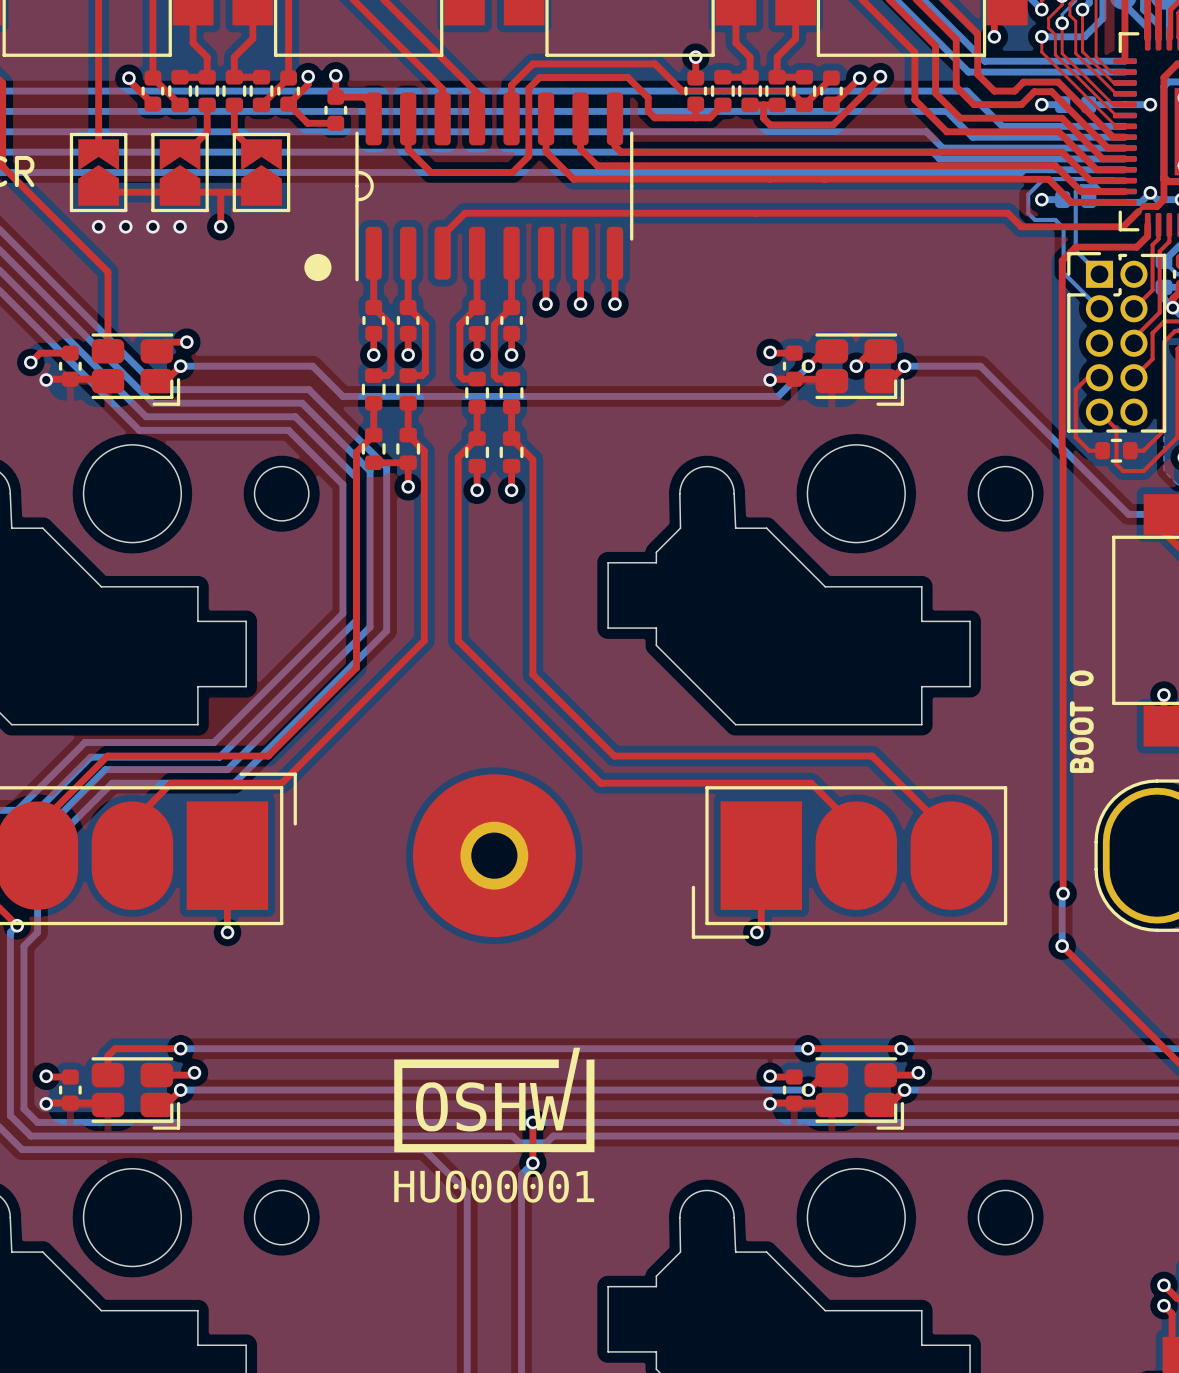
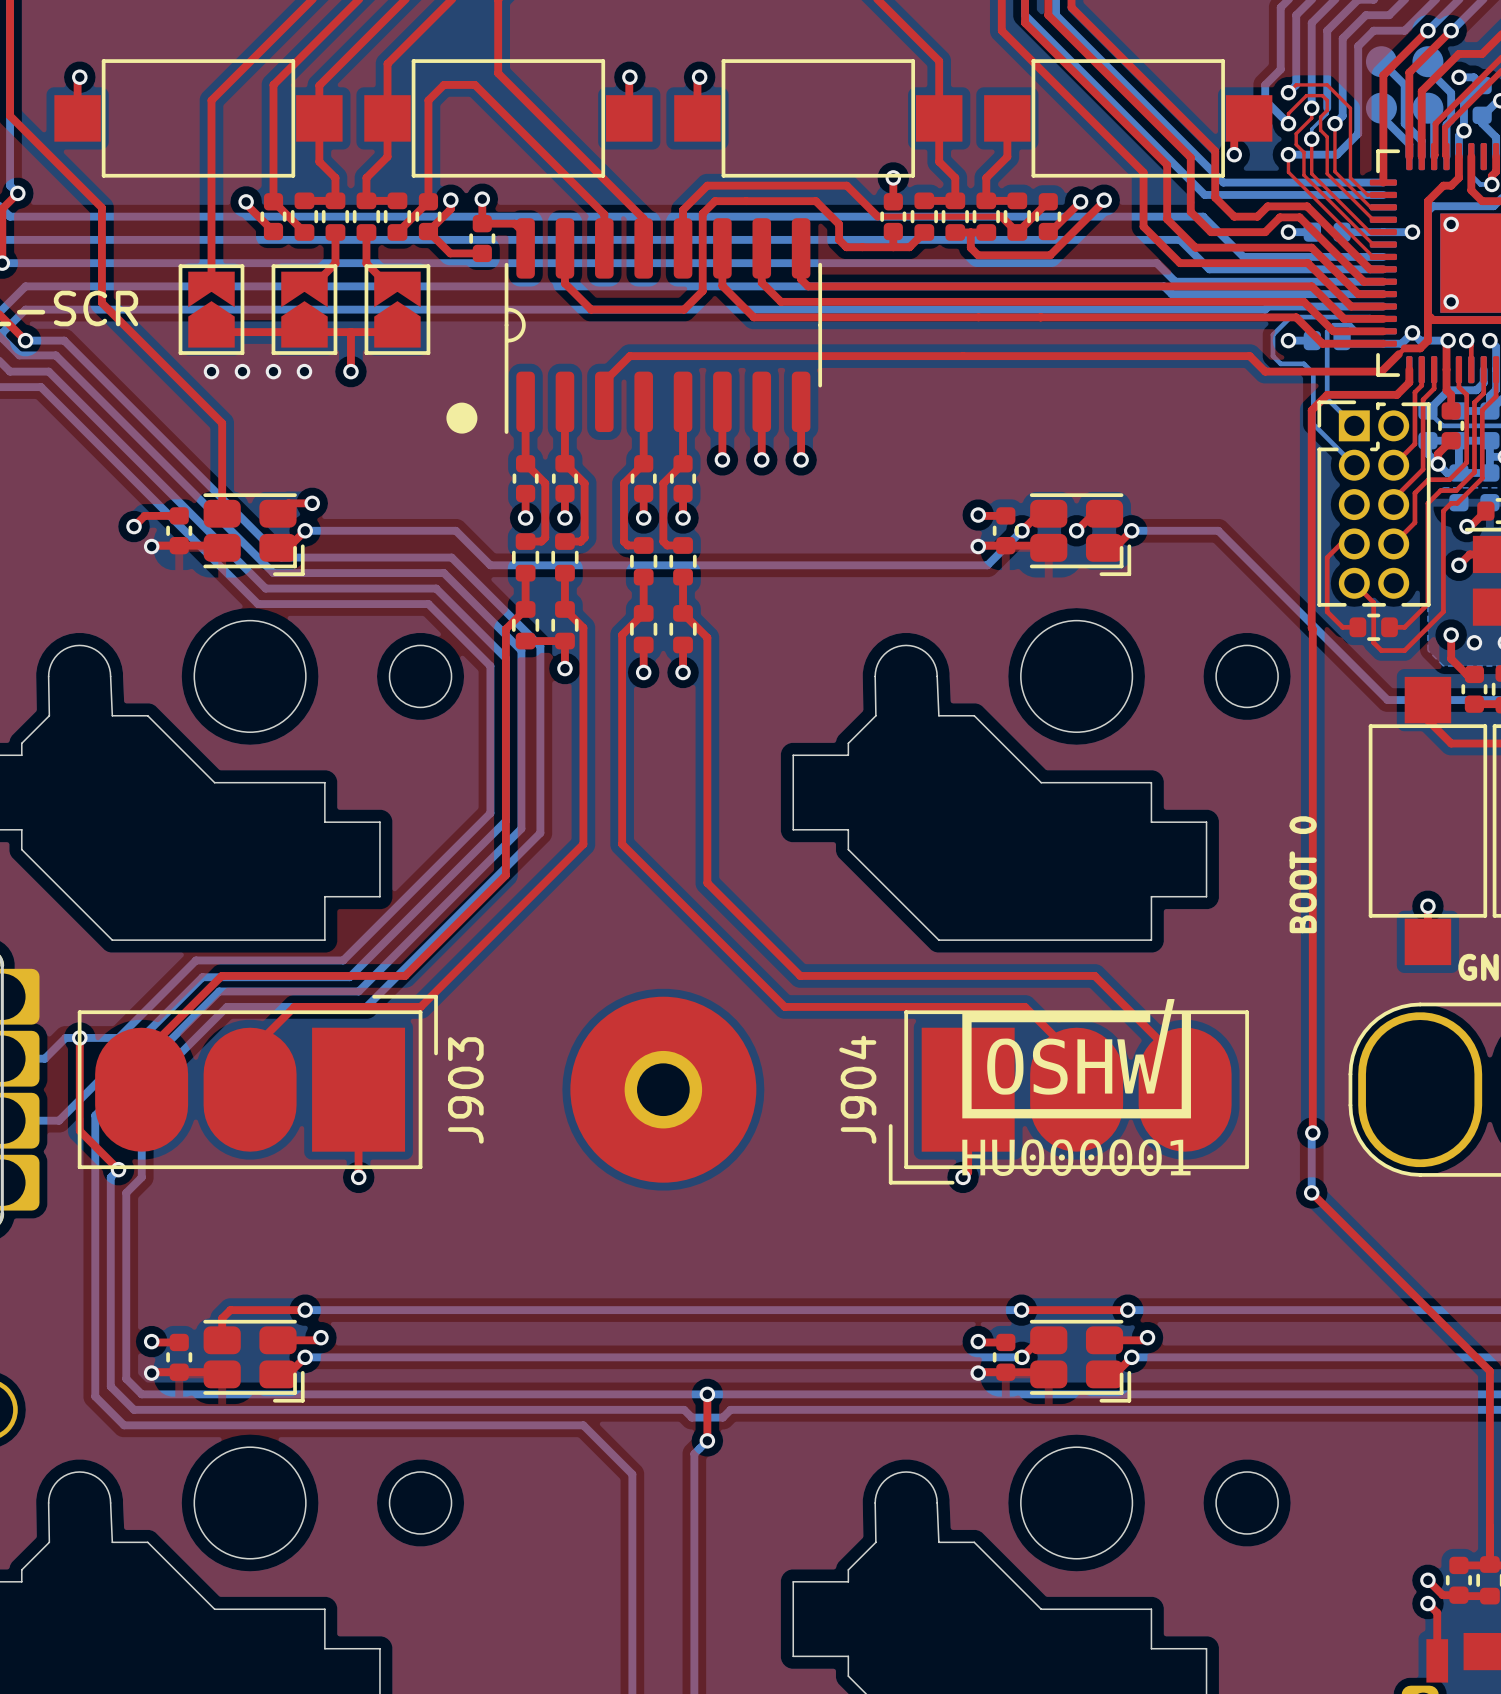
text position: BOOT 0 (1081, 721) -> BOOT 0 (1303, 874)
J904 name: none -> J904 (857, 1089)
J903 name: none -> J903 (465, 1090)
drawing position: (494, 1125) -> (1076, 1087)

